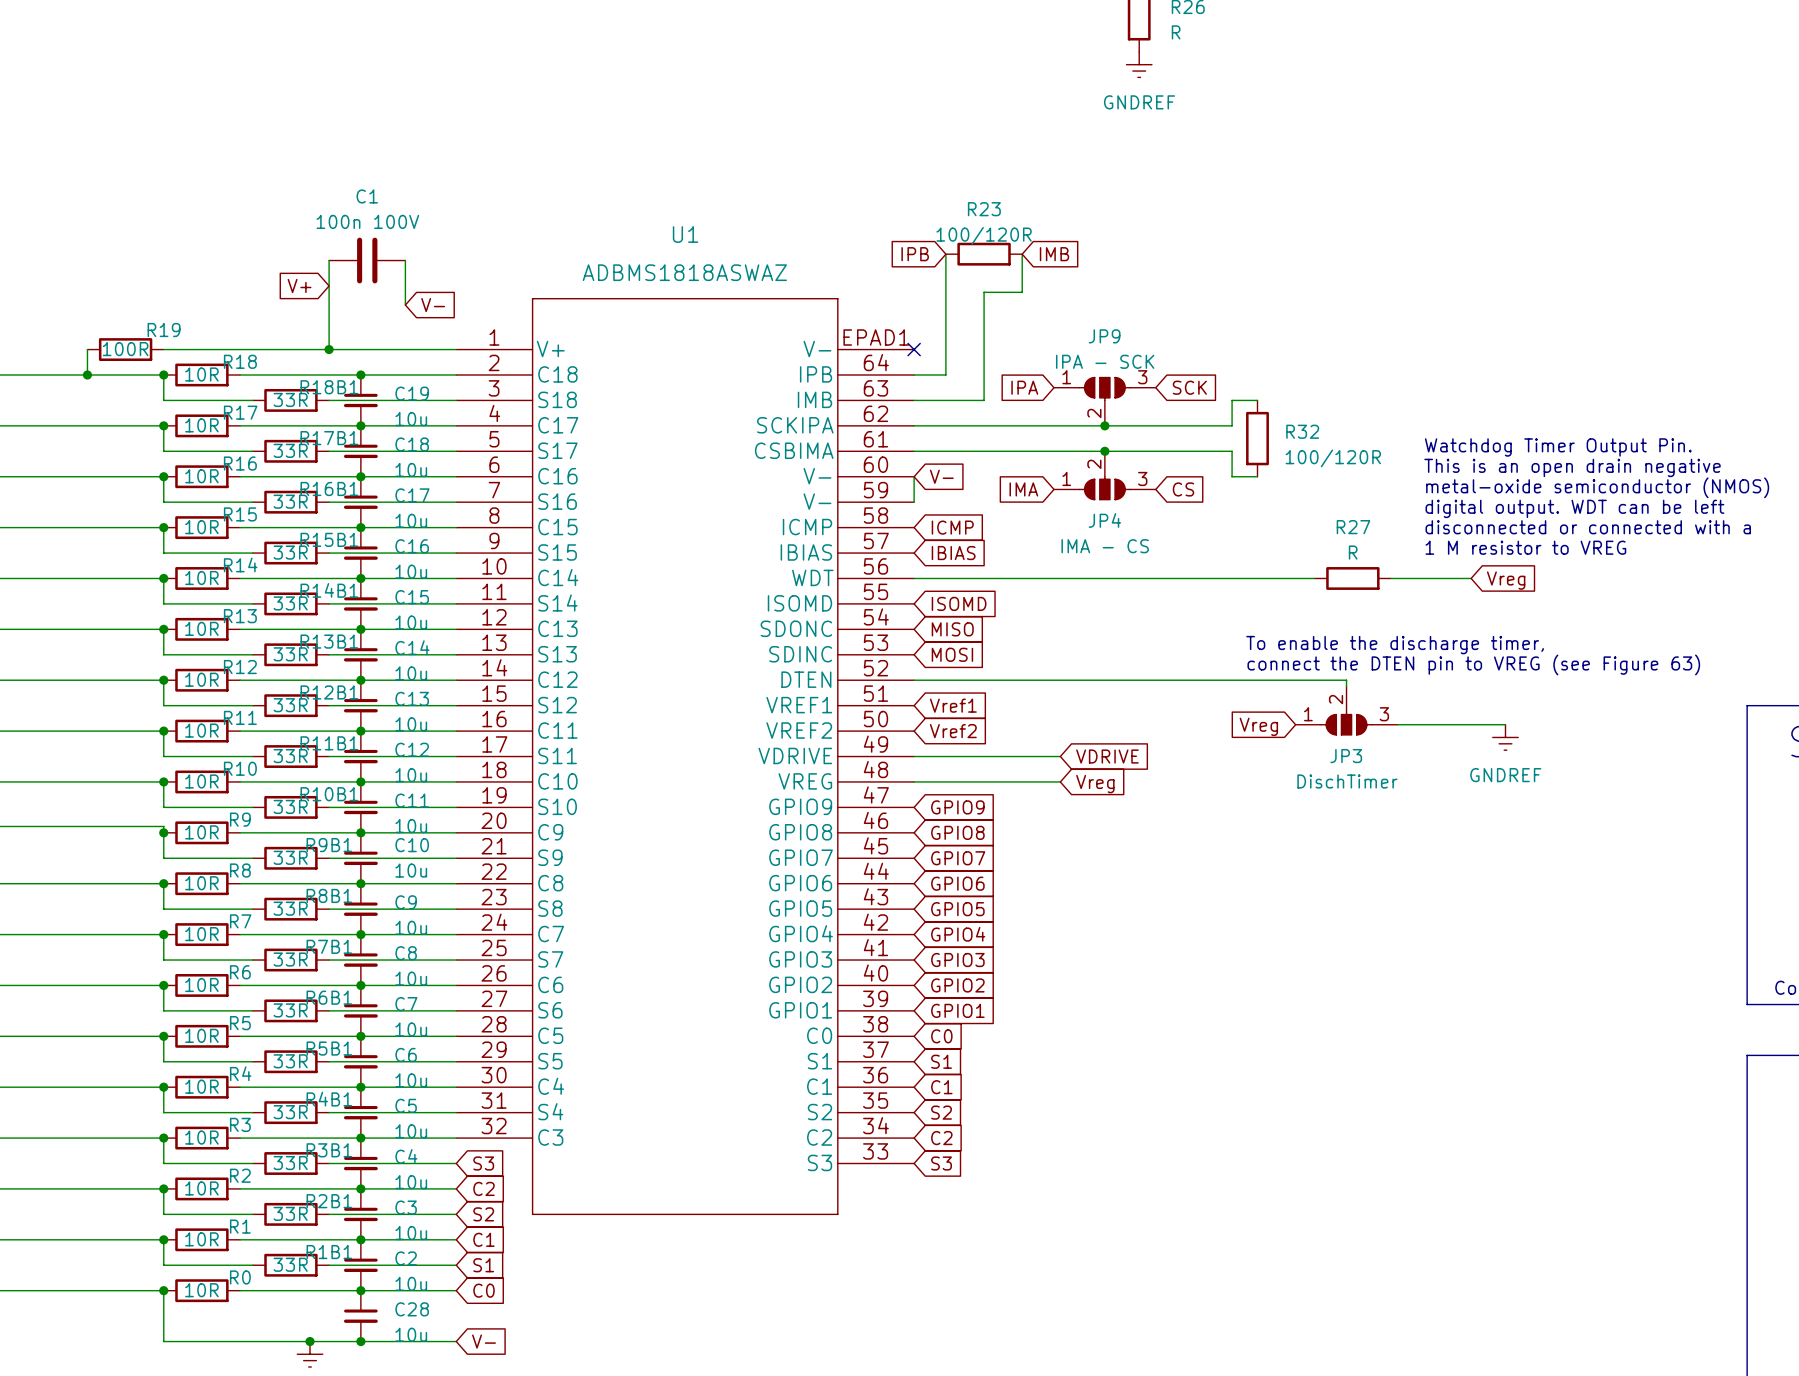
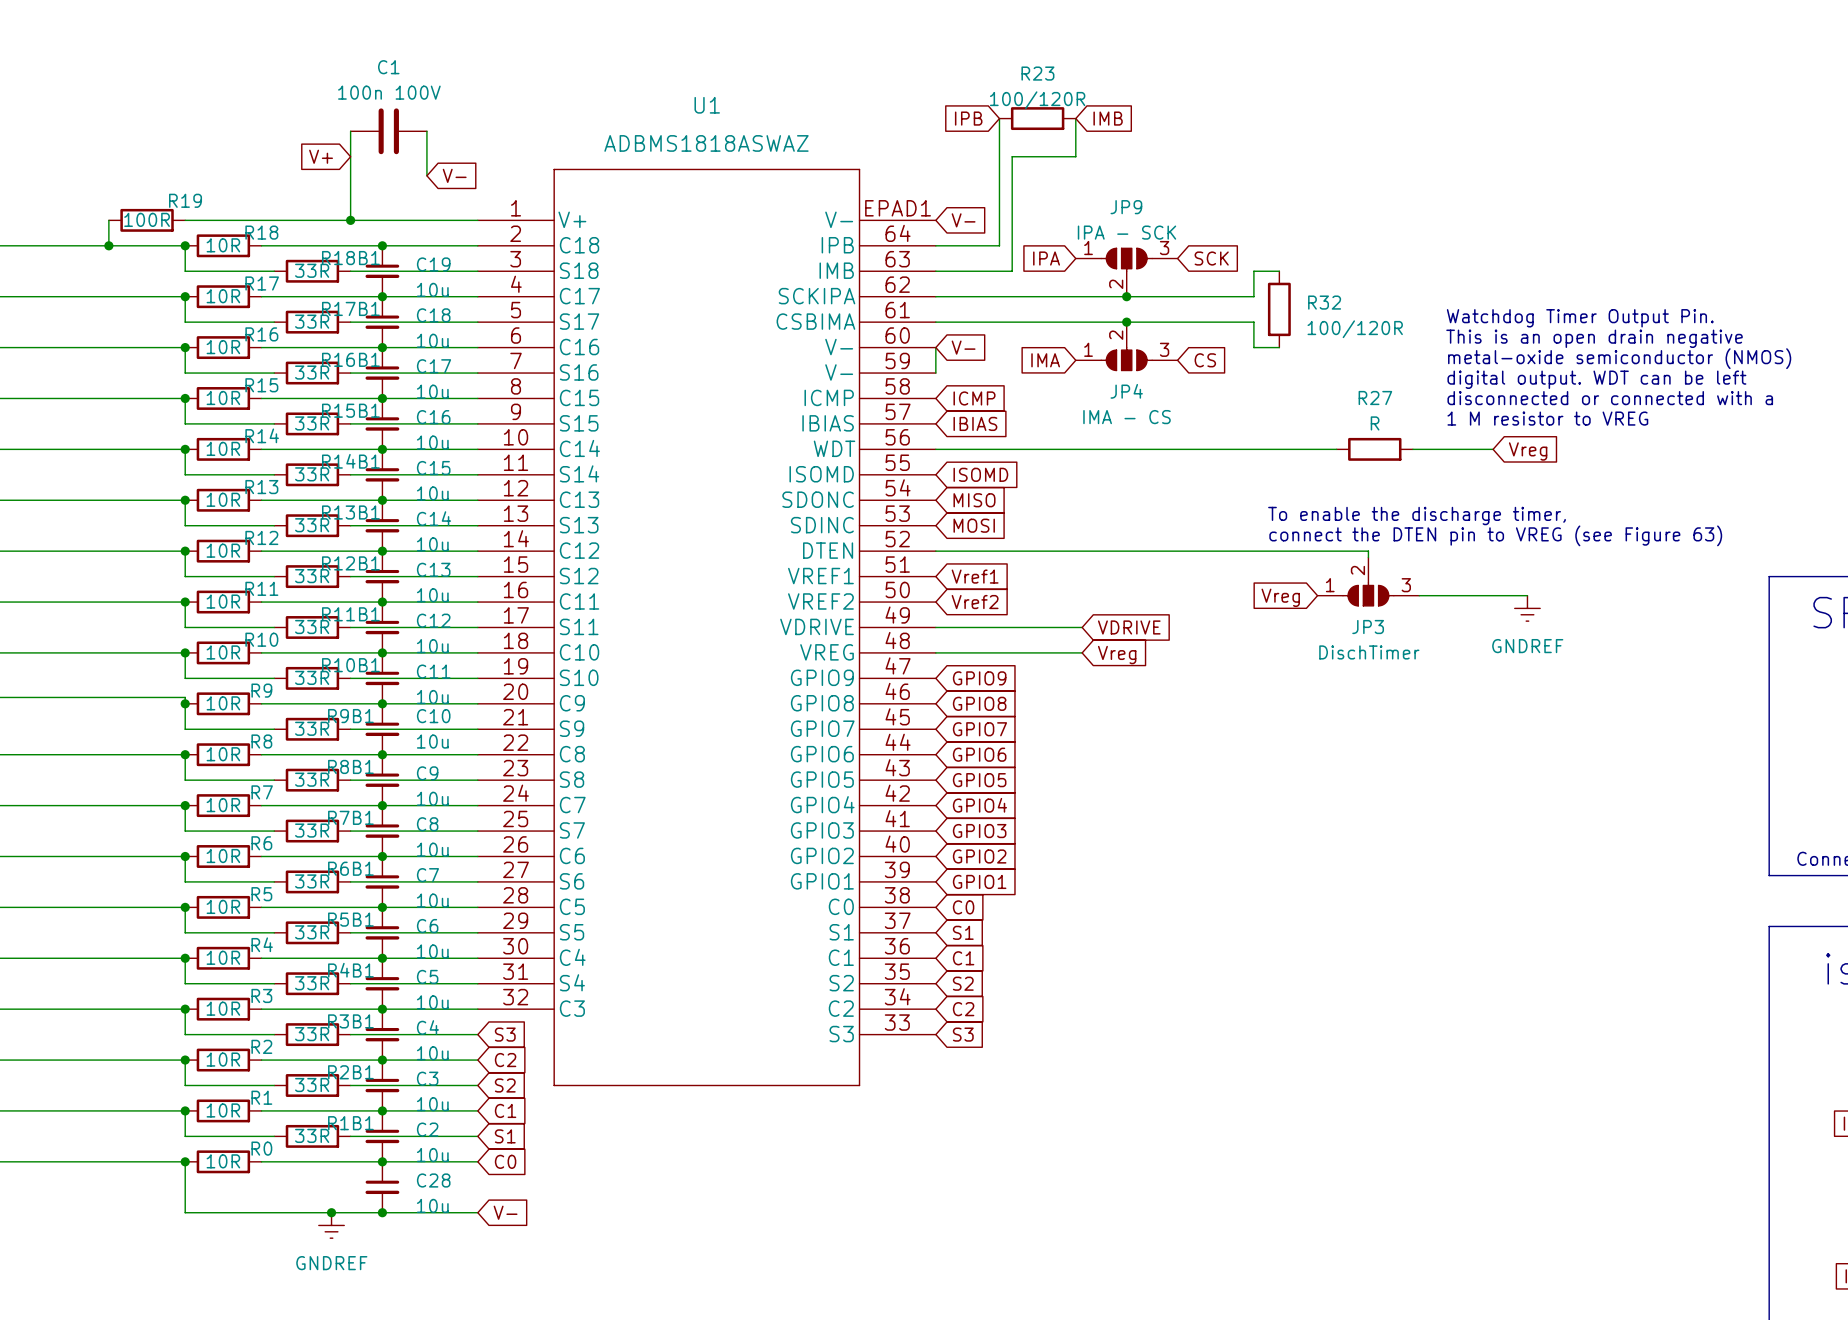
global label position: IPB (915, 254) -> IPB (968, 118)
wire: (945, 254) (945, 374) -> (999, 118) (999, 245) (967, 245)
R23 position: (984, 254) -> (1037, 118)
wire: (1022, 254) (1022, 292) (984, 292) (984, 400) -> (1075, 118) (1075, 156) (1012, 156) (1012, 271) (1005, 271)
global label position: IMB (1054, 254) -> IMB (1108, 118)
no-connect mark: (914, 349) -> none
global label: none -> V- (963, 220)

